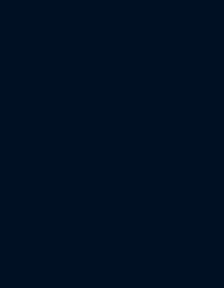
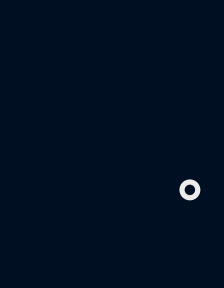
via: none -> (189, 189)

